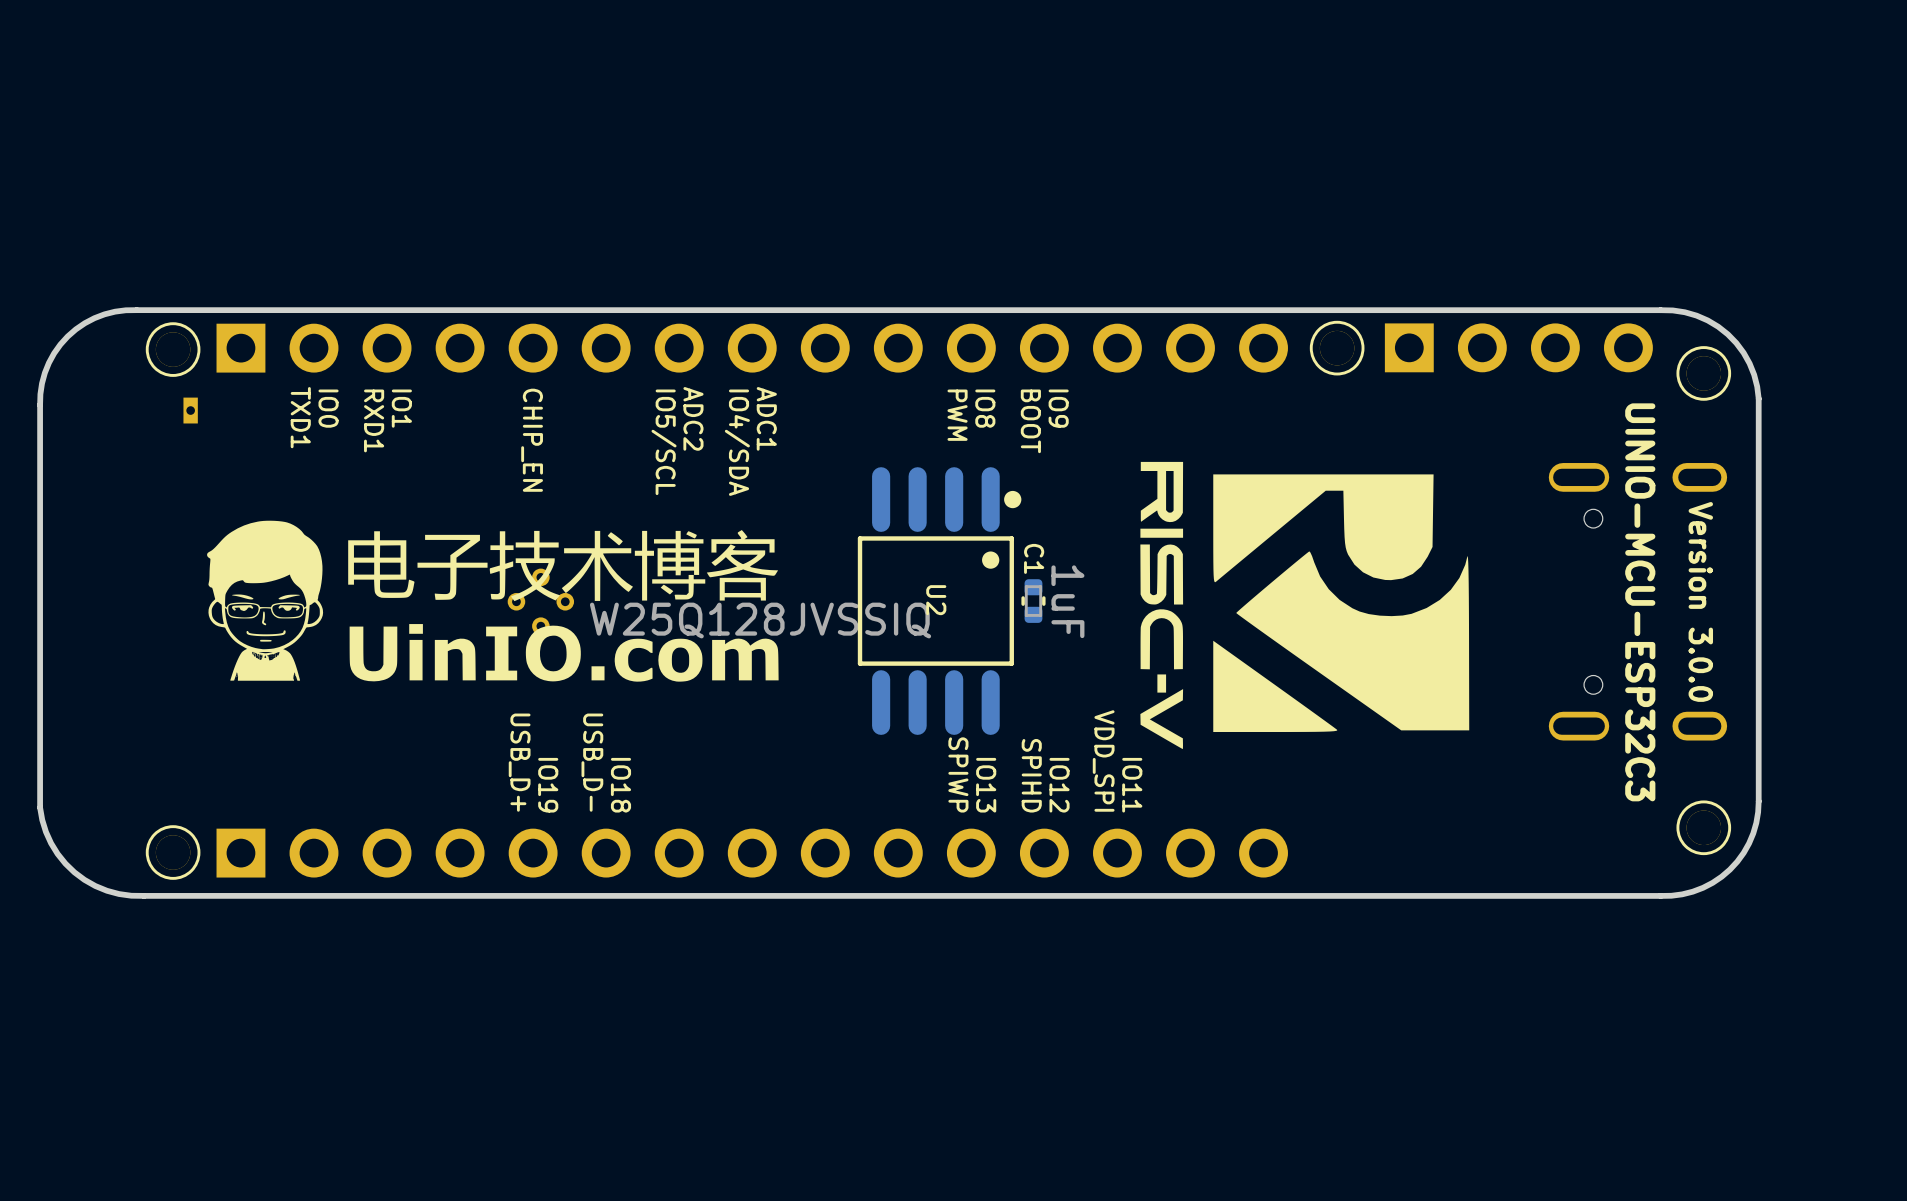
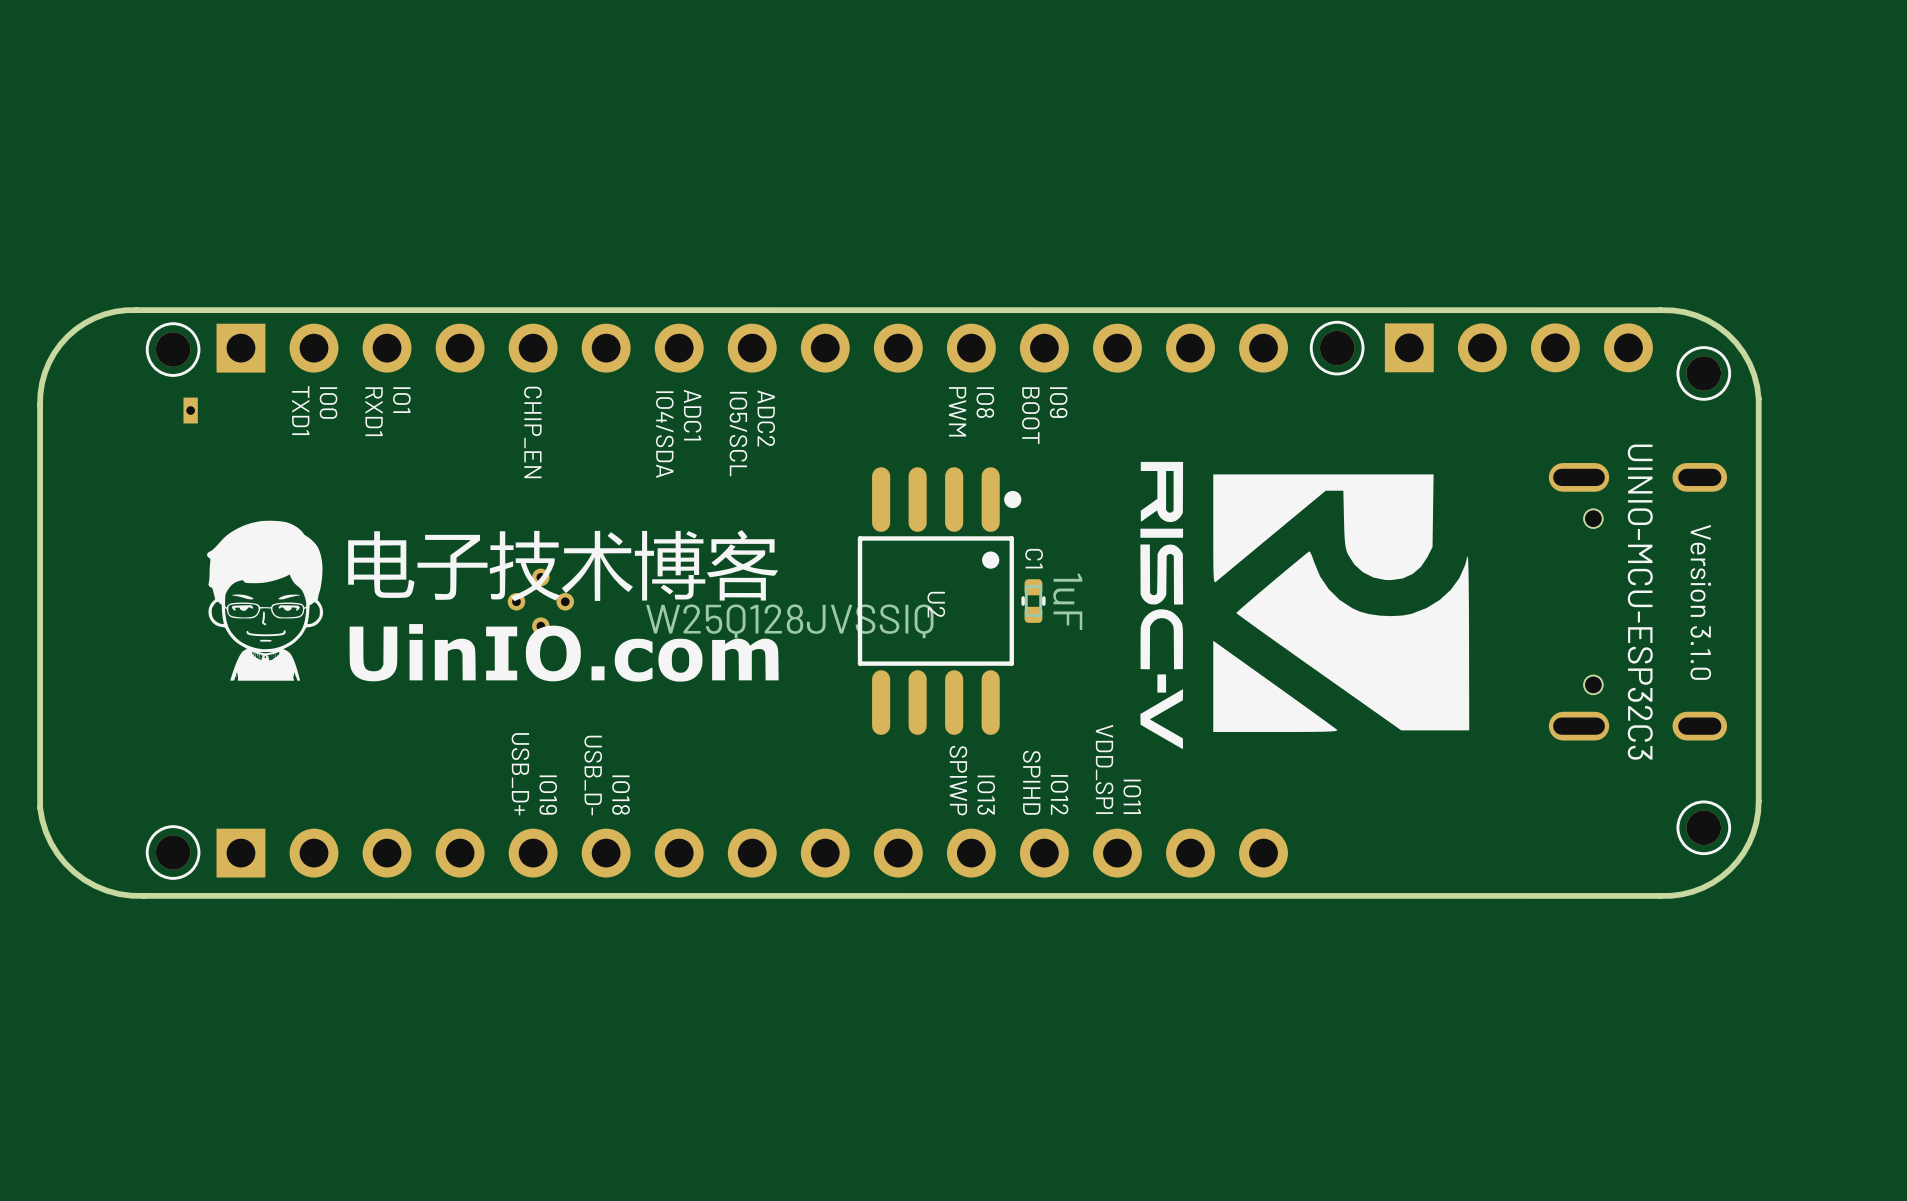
text: ADC2 (693, 418) -> ADC1 (692, 415)
text: ADC1 (766, 418) -> ADC2 (766, 418)
text: IO5/SCL (664, 442) -> IO4/SDA (664, 434)
text: IO4/SDA (737, 442) -> IO5/SCL (738, 434)
text: Version 3.0.0 (1700, 601) -> Version 3.1.0 (1700, 602)

